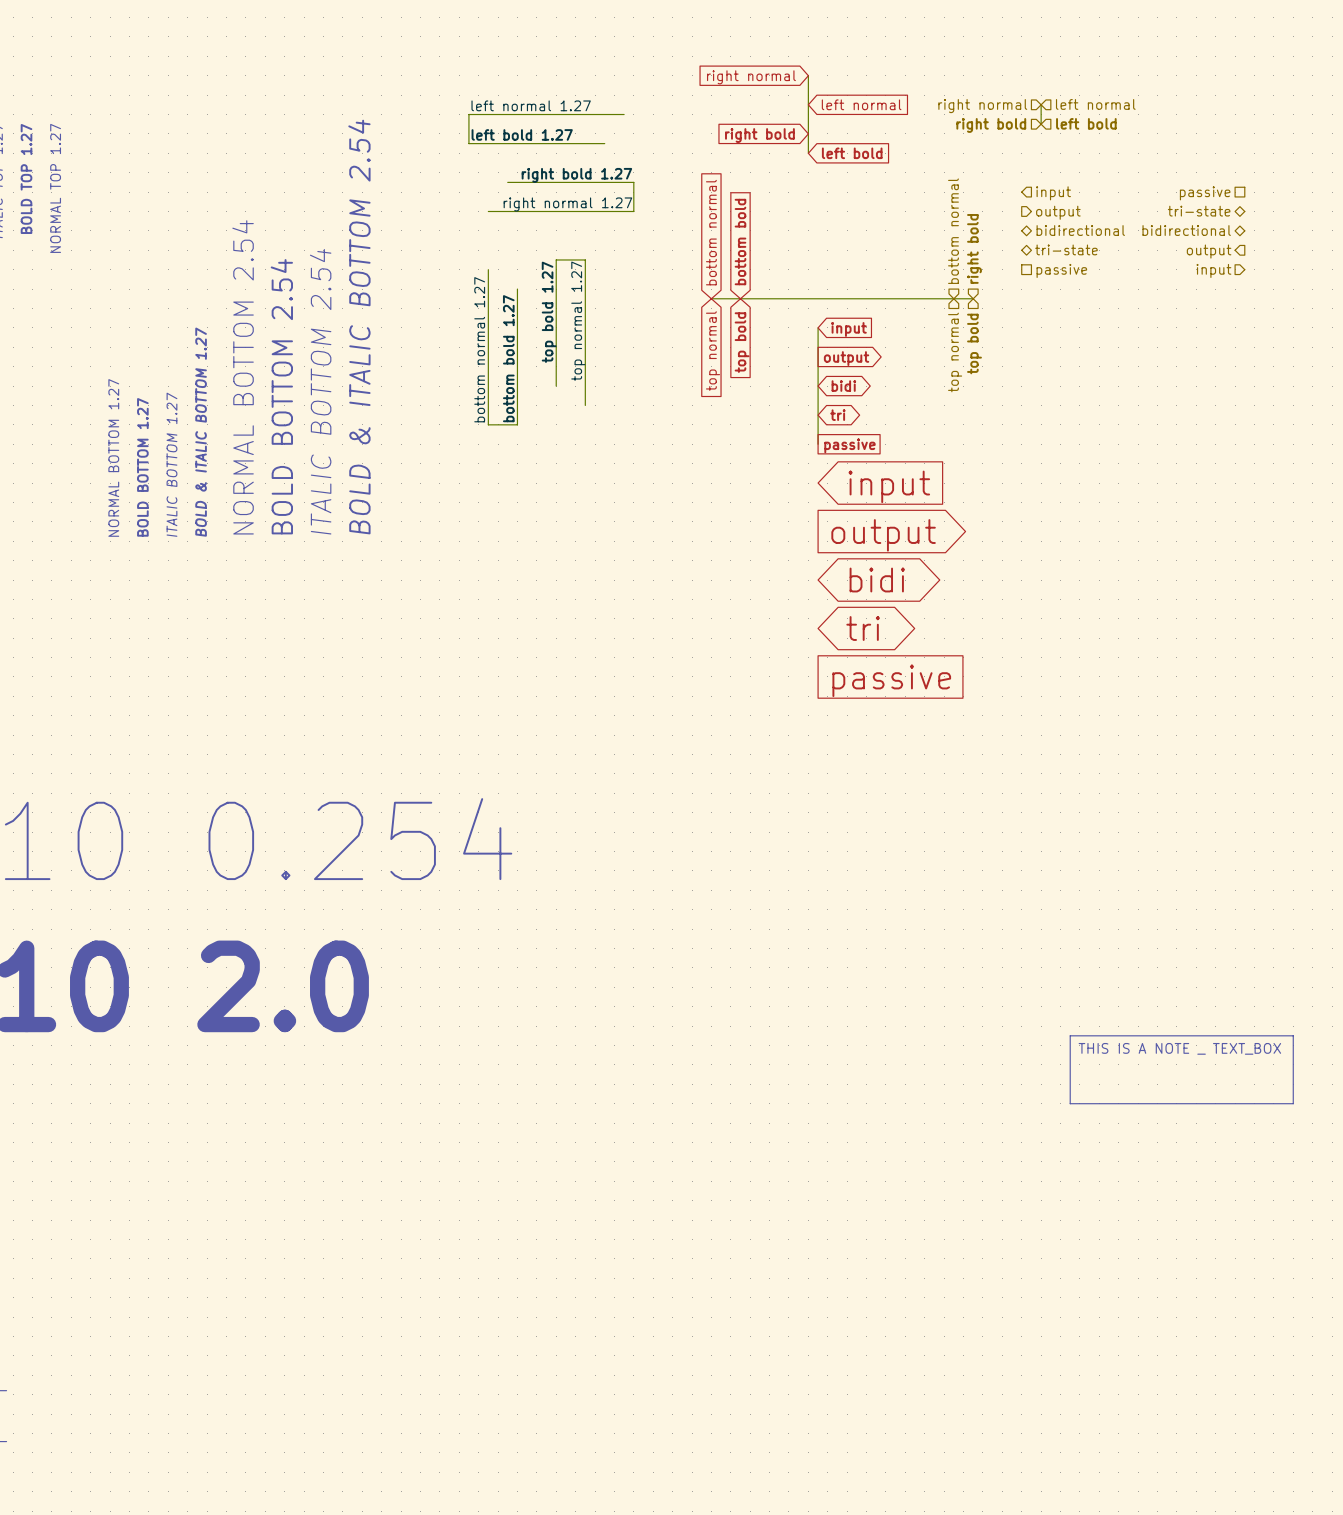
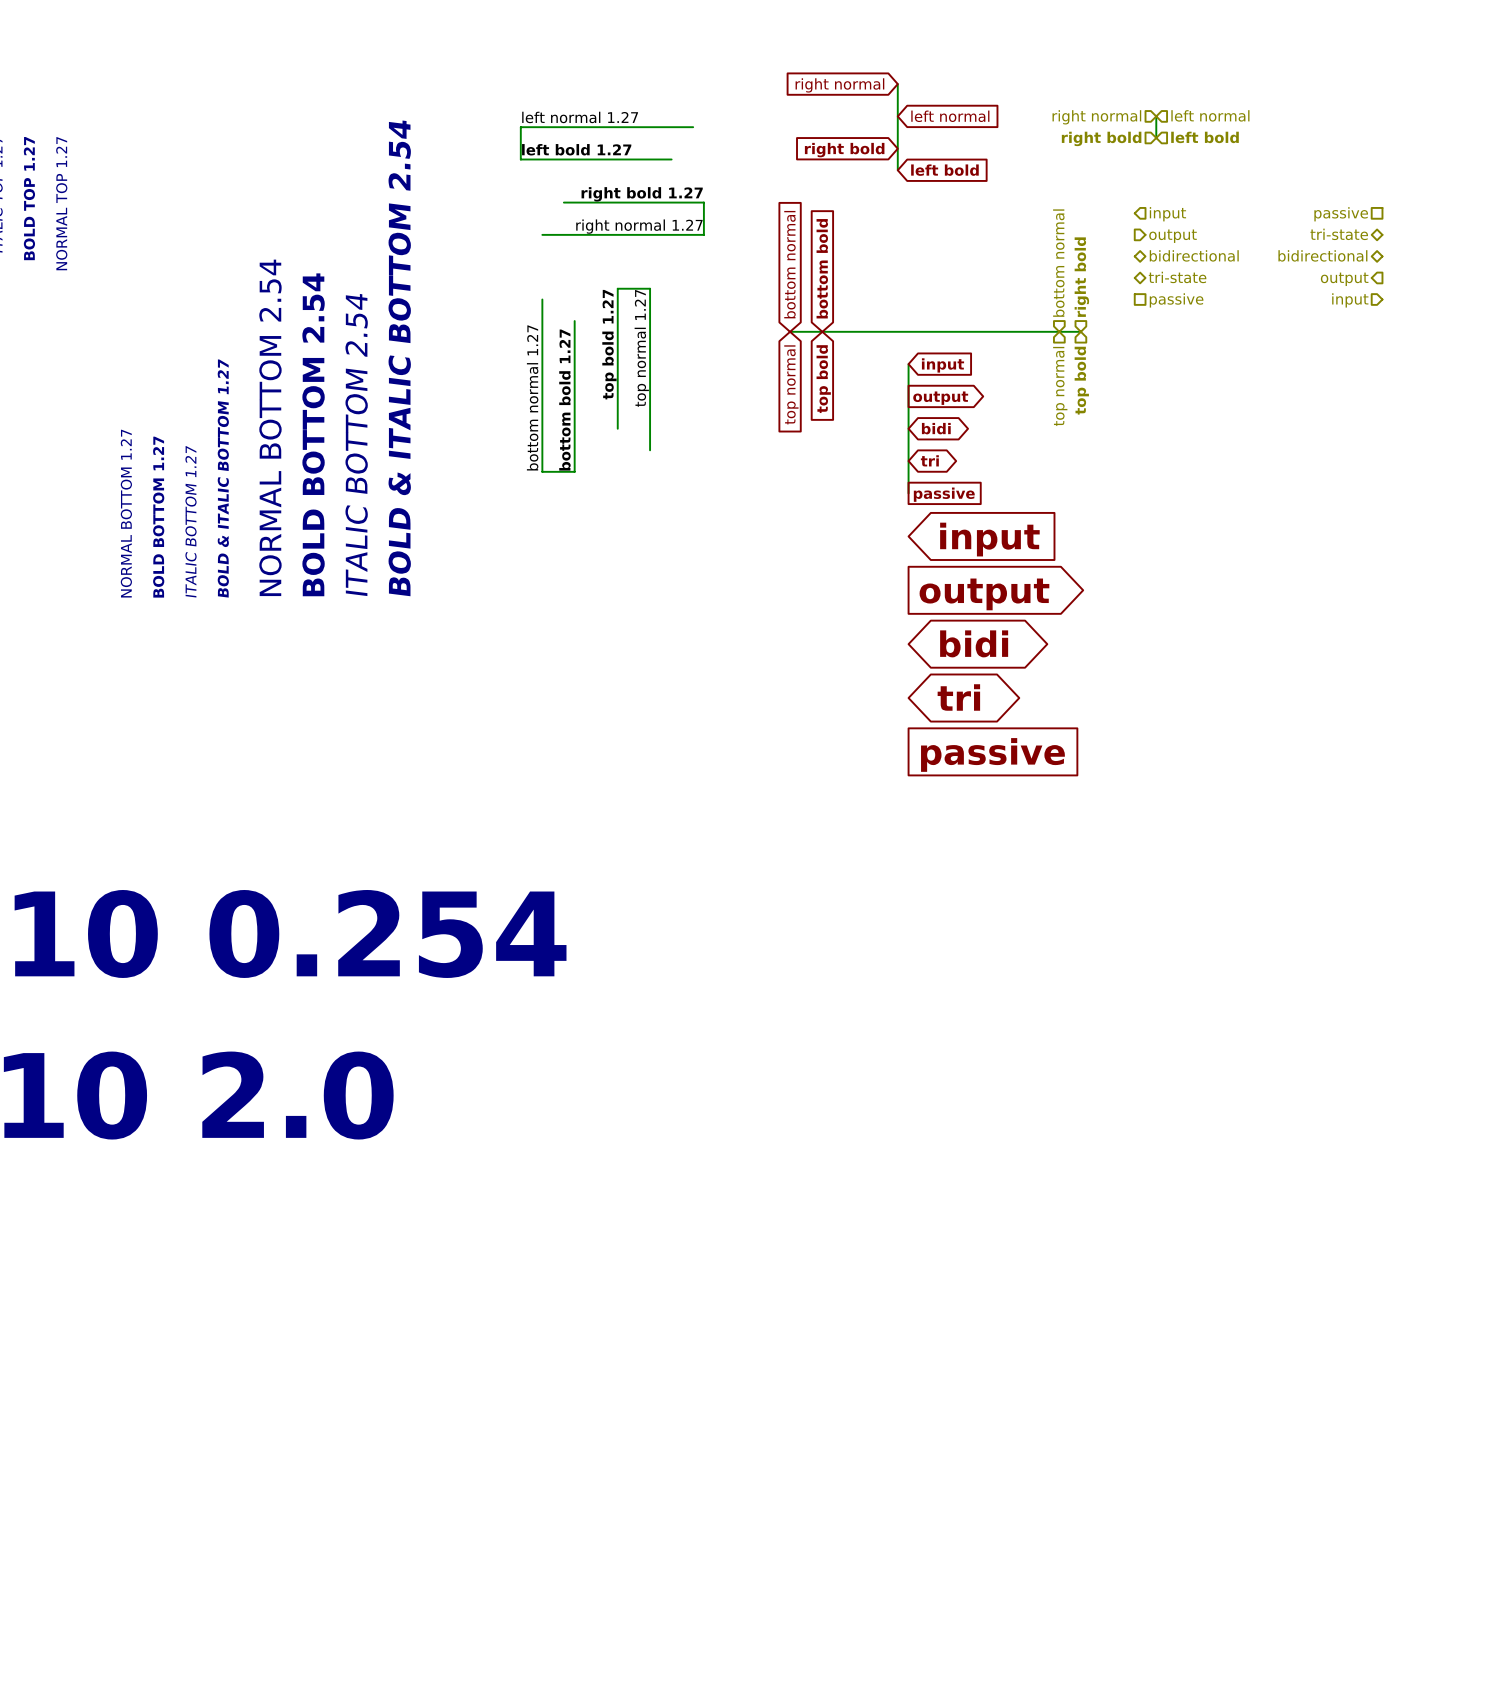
line: (1070, 1035) (1293, 1035) (1293, 1103) (1070, 1103) (1070, 1035) -> none
text: THIS IS A NOTE _ TEXT_BOX (1179, 1048) -> none

